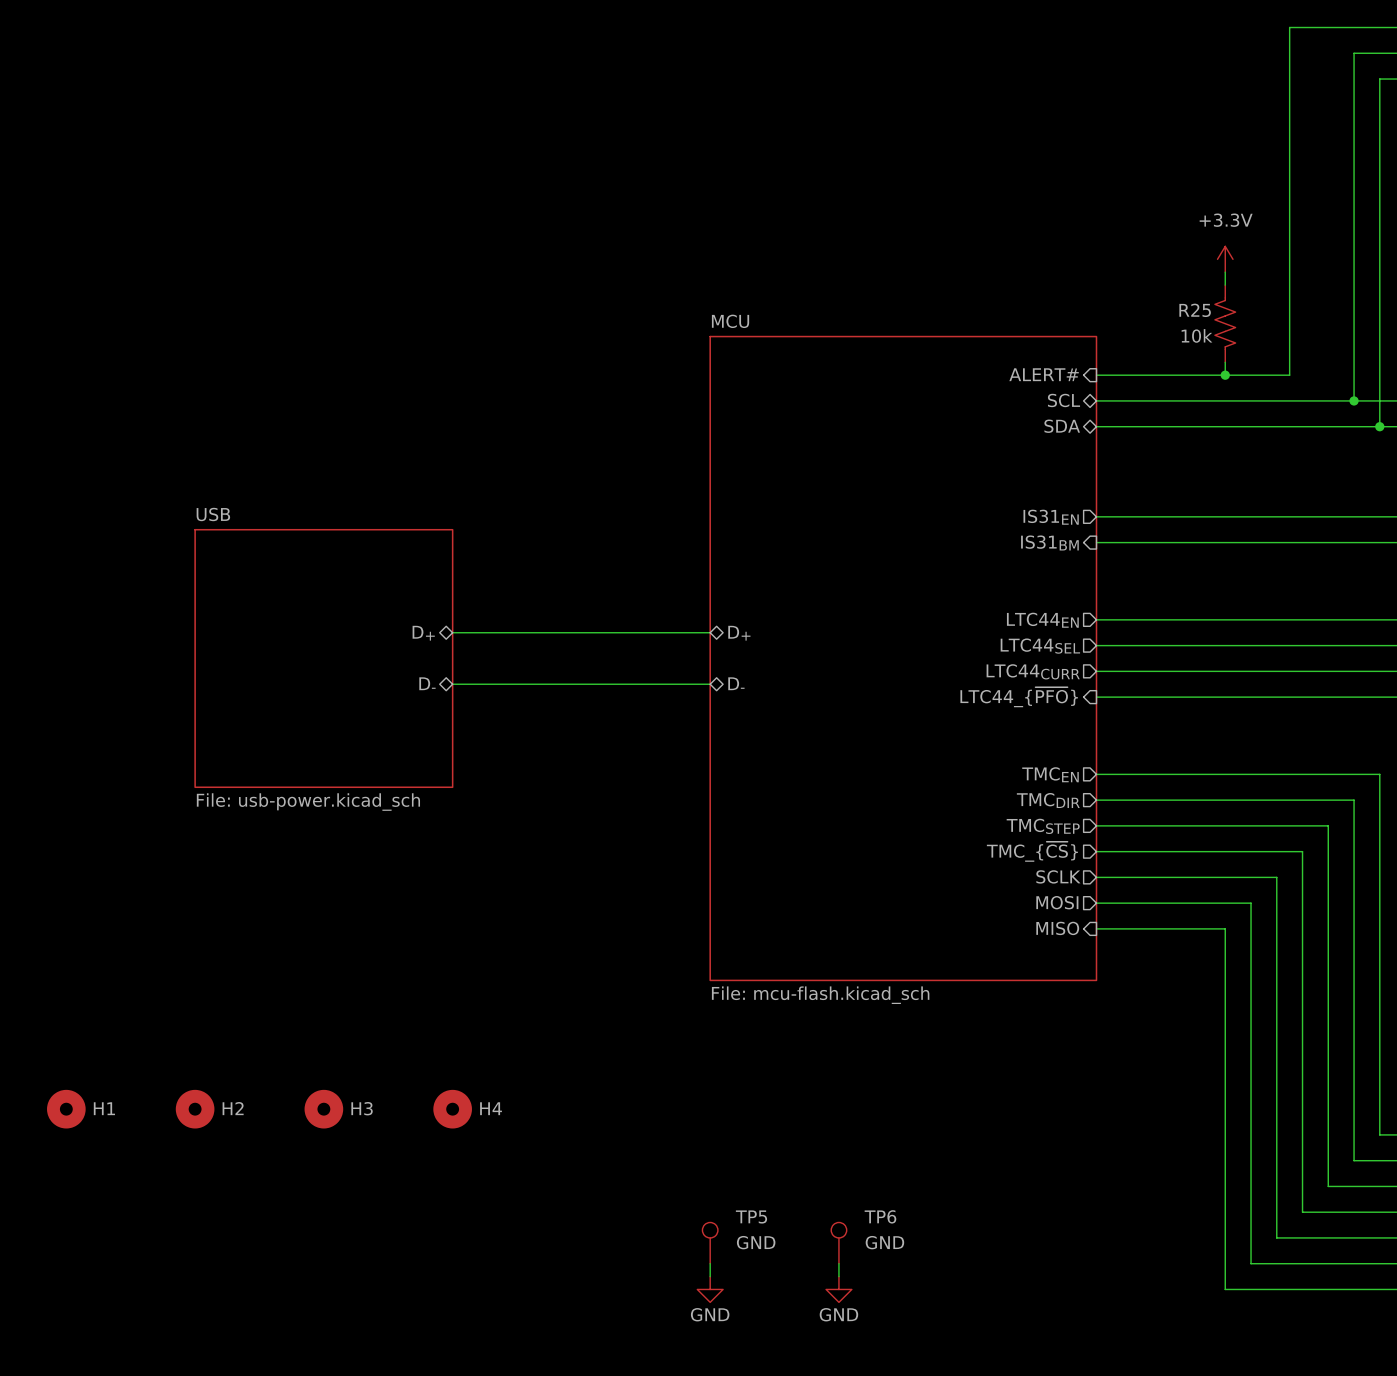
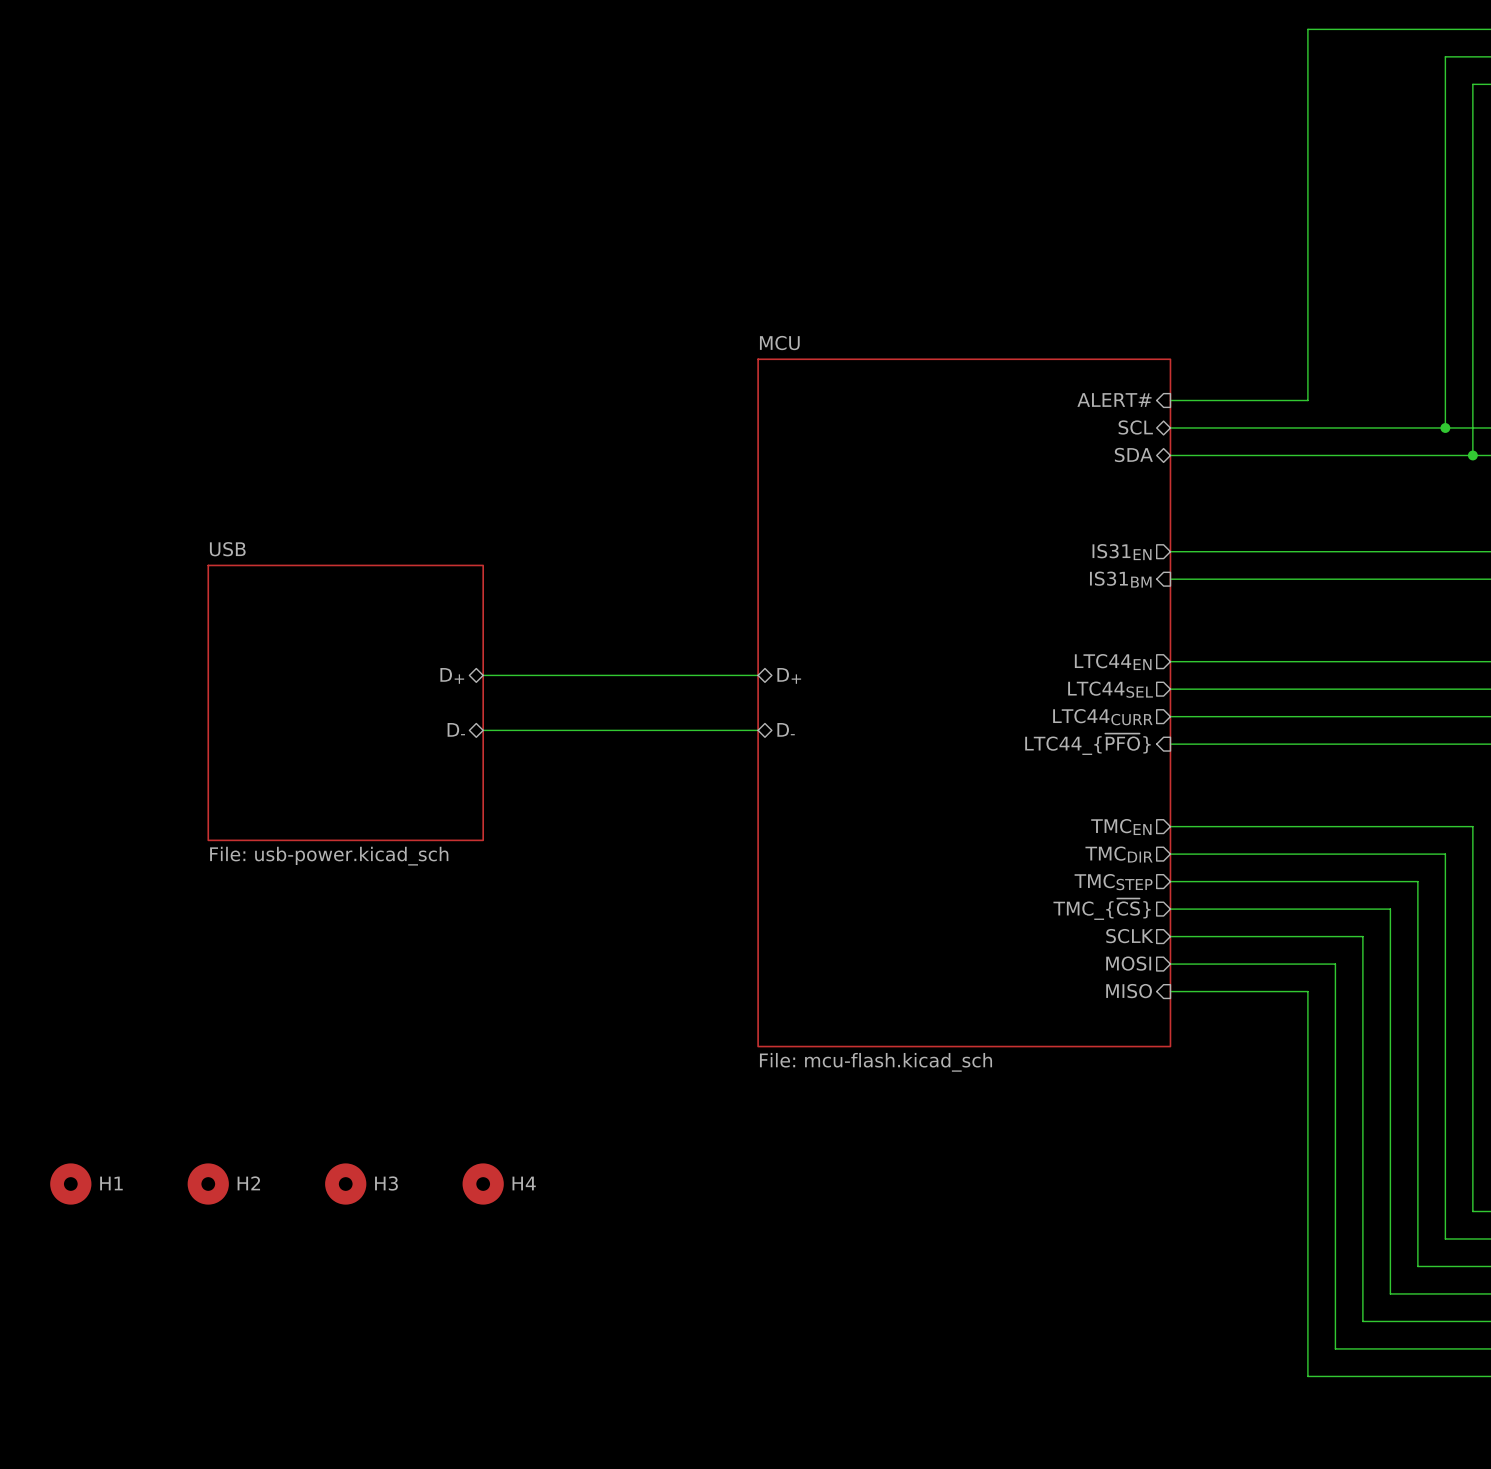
wire: (1289, 27) (1289, 375) (1225, 375) -> (1376, 29) (1307, 29) (1307, 290)
power symbol: +3.3V (1225, 259) -> none
R25: 10k (1225, 323) -> none
junction: (1225, 375) -> none
TP5: GND (710, 1243) -> none
TP6: GND (838, 1243) -> none
wire: (710, 1263) (710, 1276) -> none
wire: (838, 1263) (838, 1276) -> none
power symbol: GND (710, 1289) -> none
power symbol: GND (838, 1289) -> none

